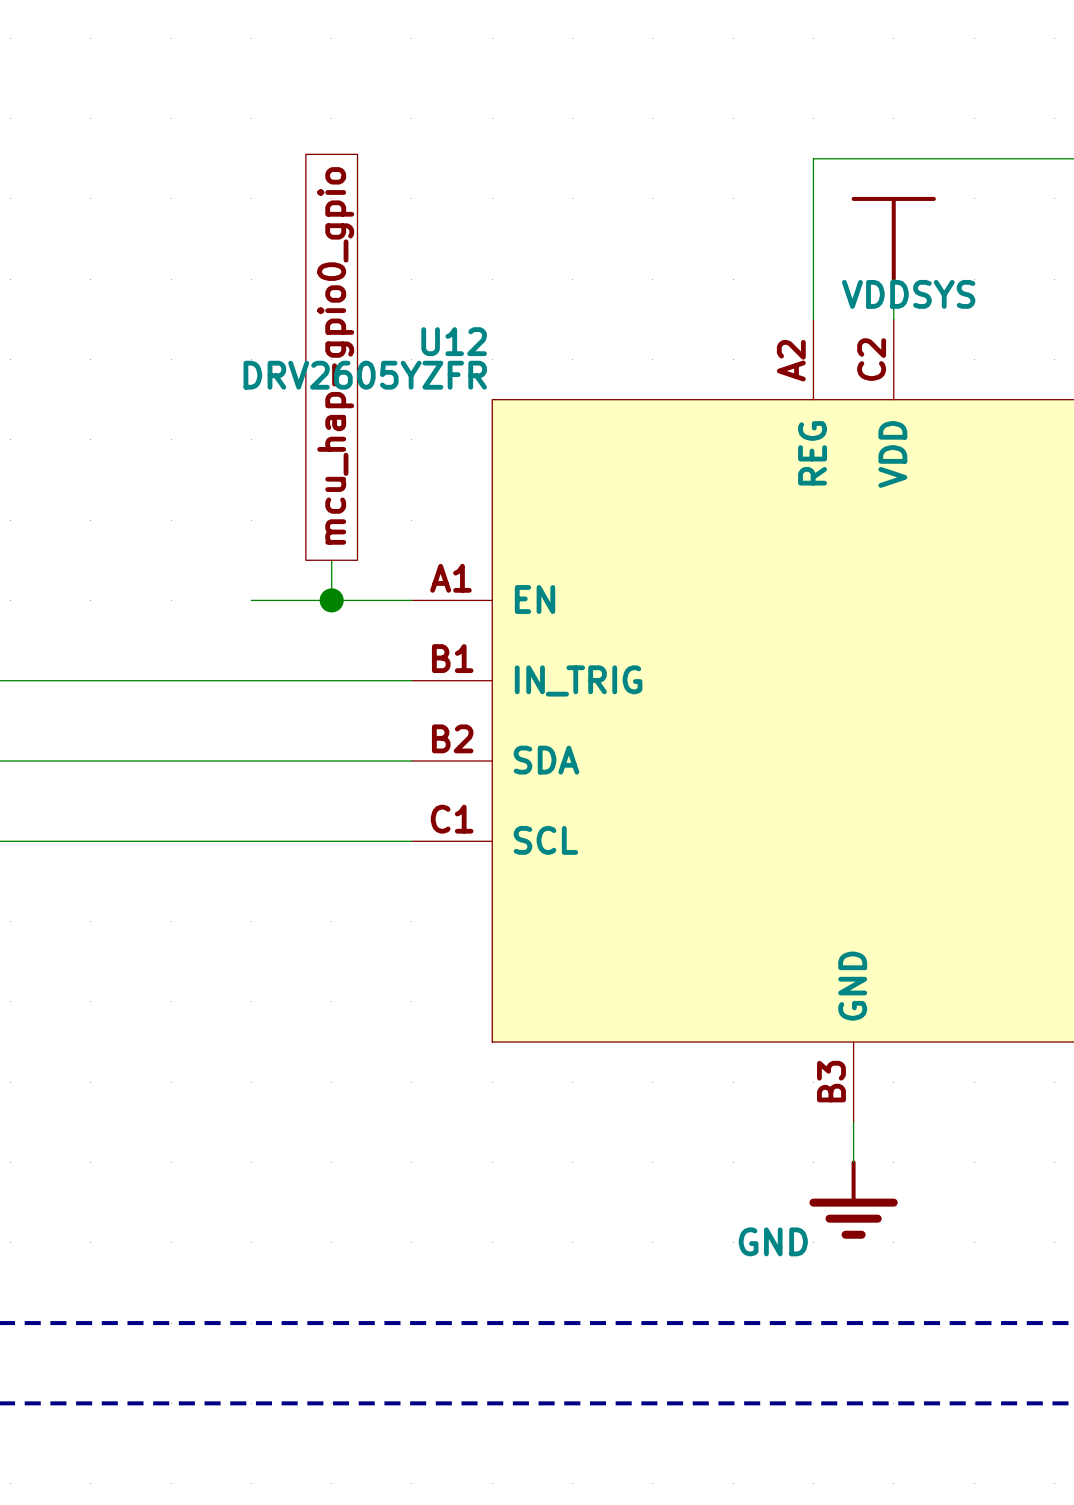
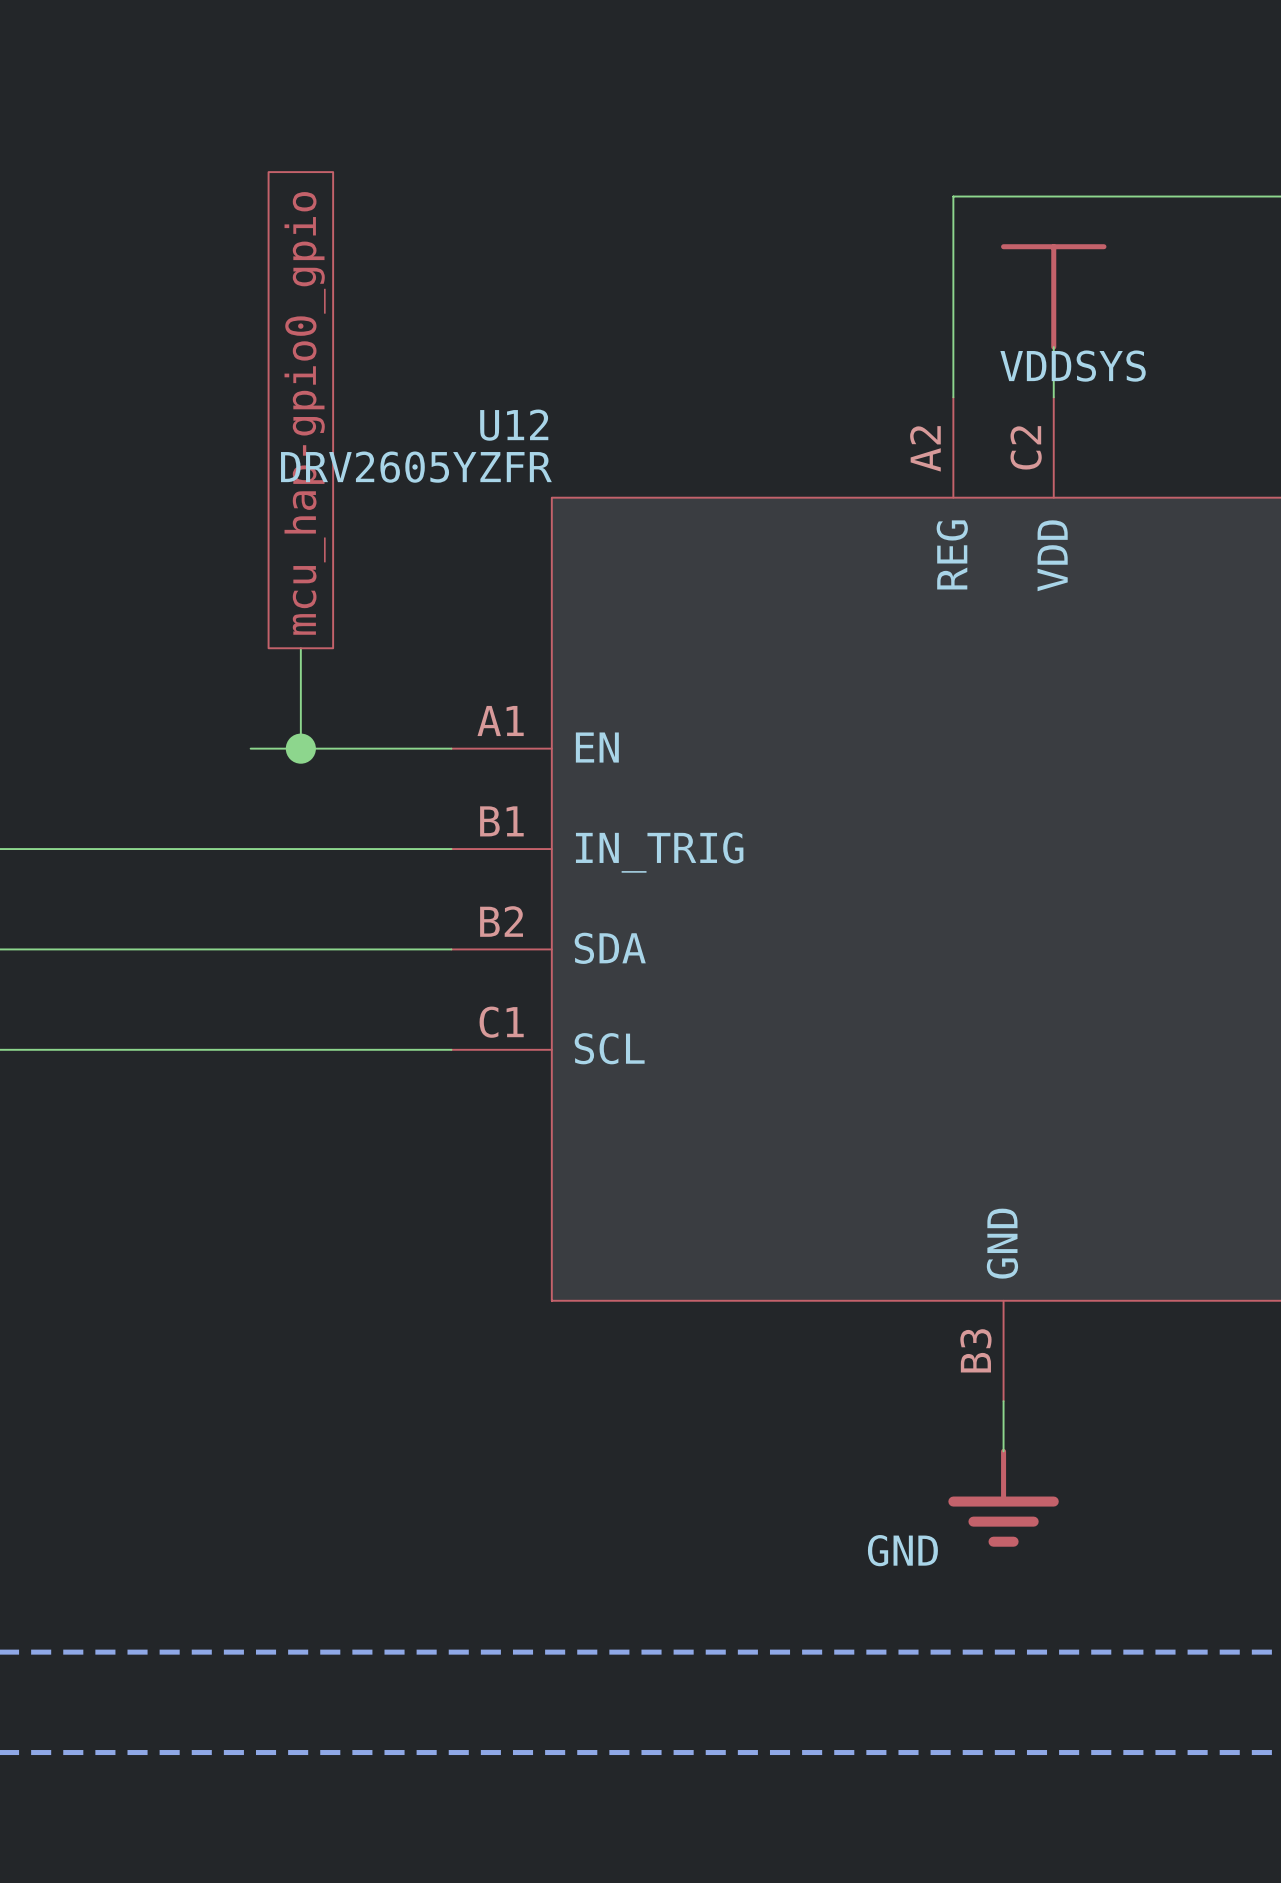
global label position: mcu_hap-gpio0_gpio (335, 355) -> mcu_hap-gpio0_gpio (305, 413)
wire: none -> (300, 648) (300, 748)
wire: (331, 560) (331, 600) -> none
junction position: (331, 600) -> (300, 748)

